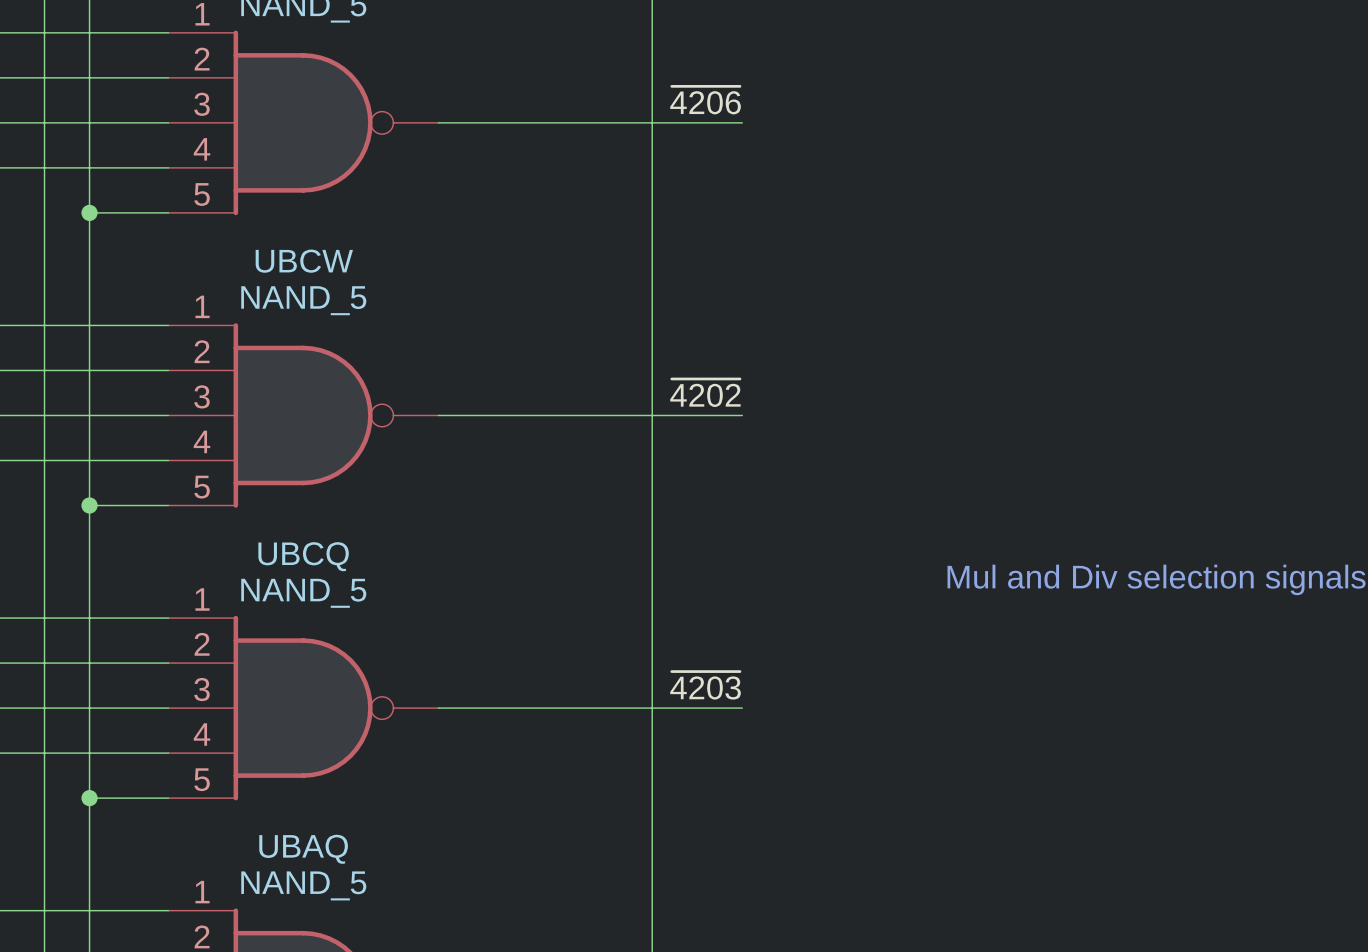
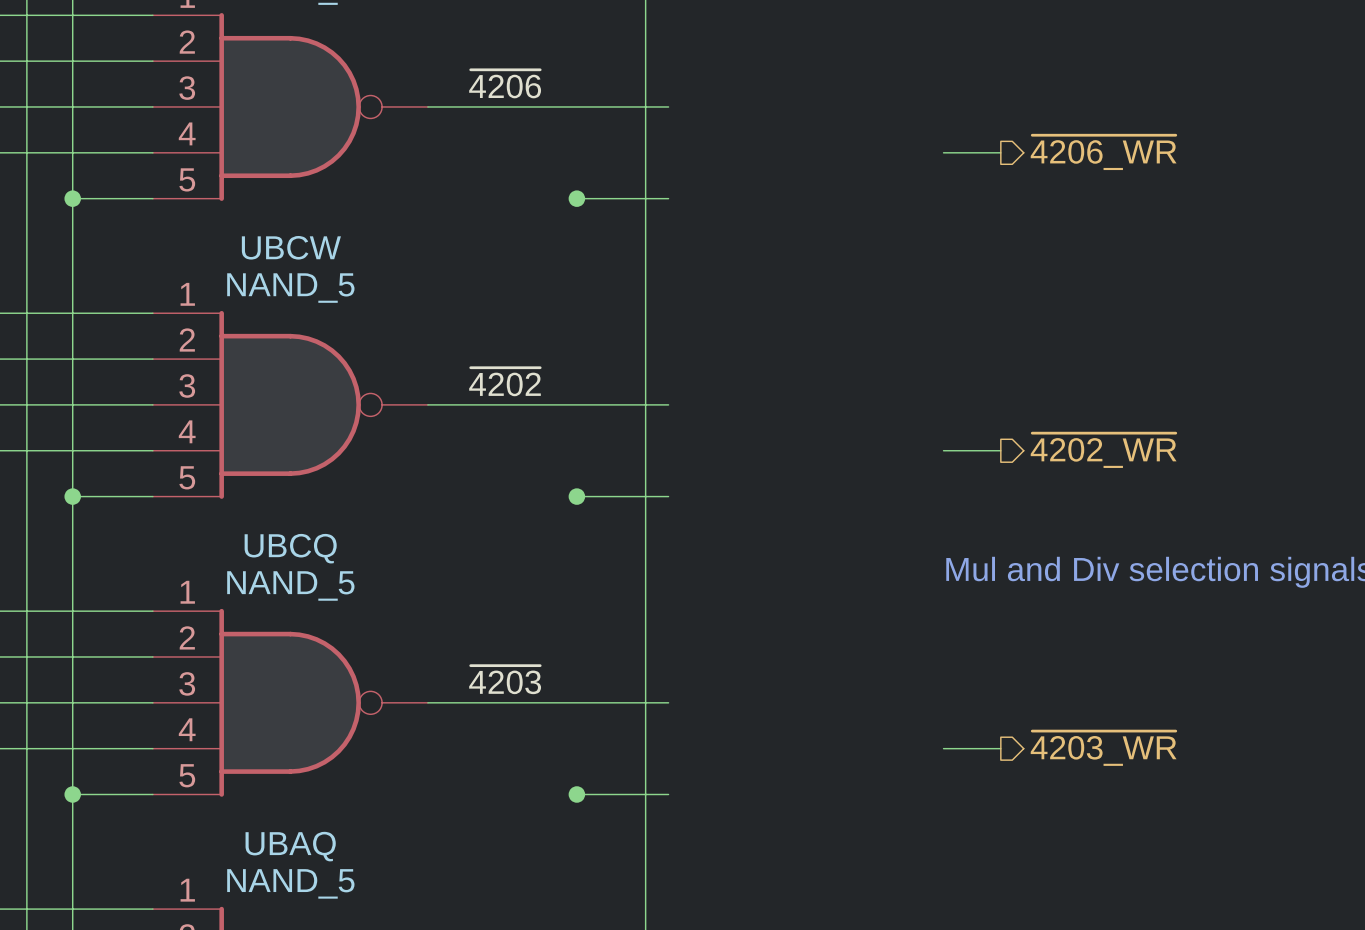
label position: ~{4206} (705, 100) -> ~{4206} (505, 84)
wire: (674, 122) (742, 122) -> none
wire: none -> (943, 152) (1000, 152)
hierarchical label: none -> ~{4206_WR} (1103, 152)
wire: none -> (576, 198) (668, 198)
junction: none -> (576, 198)
label position: ~{4202} (705, 392) -> ~{4202} (505, 381)
wire: (674, 415) (742, 415) -> none
wire: none -> (943, 450) (1000, 450)
hierarchical label: none -> ~{4202_WR} (1103, 450)
wire: none -> (576, 496) (668, 496)
junction: none -> (576, 496)
label position: ~{4203} (705, 685) -> ~{4203} (505, 679)
wire: (674, 708) (742, 708) -> none
hierarchical label: none -> ~{4203_WR} (1103, 748)
wire: none -> (943, 748) (1000, 748)
wire: none -> (576, 794) (668, 794)
junction: none -> (576, 794)

